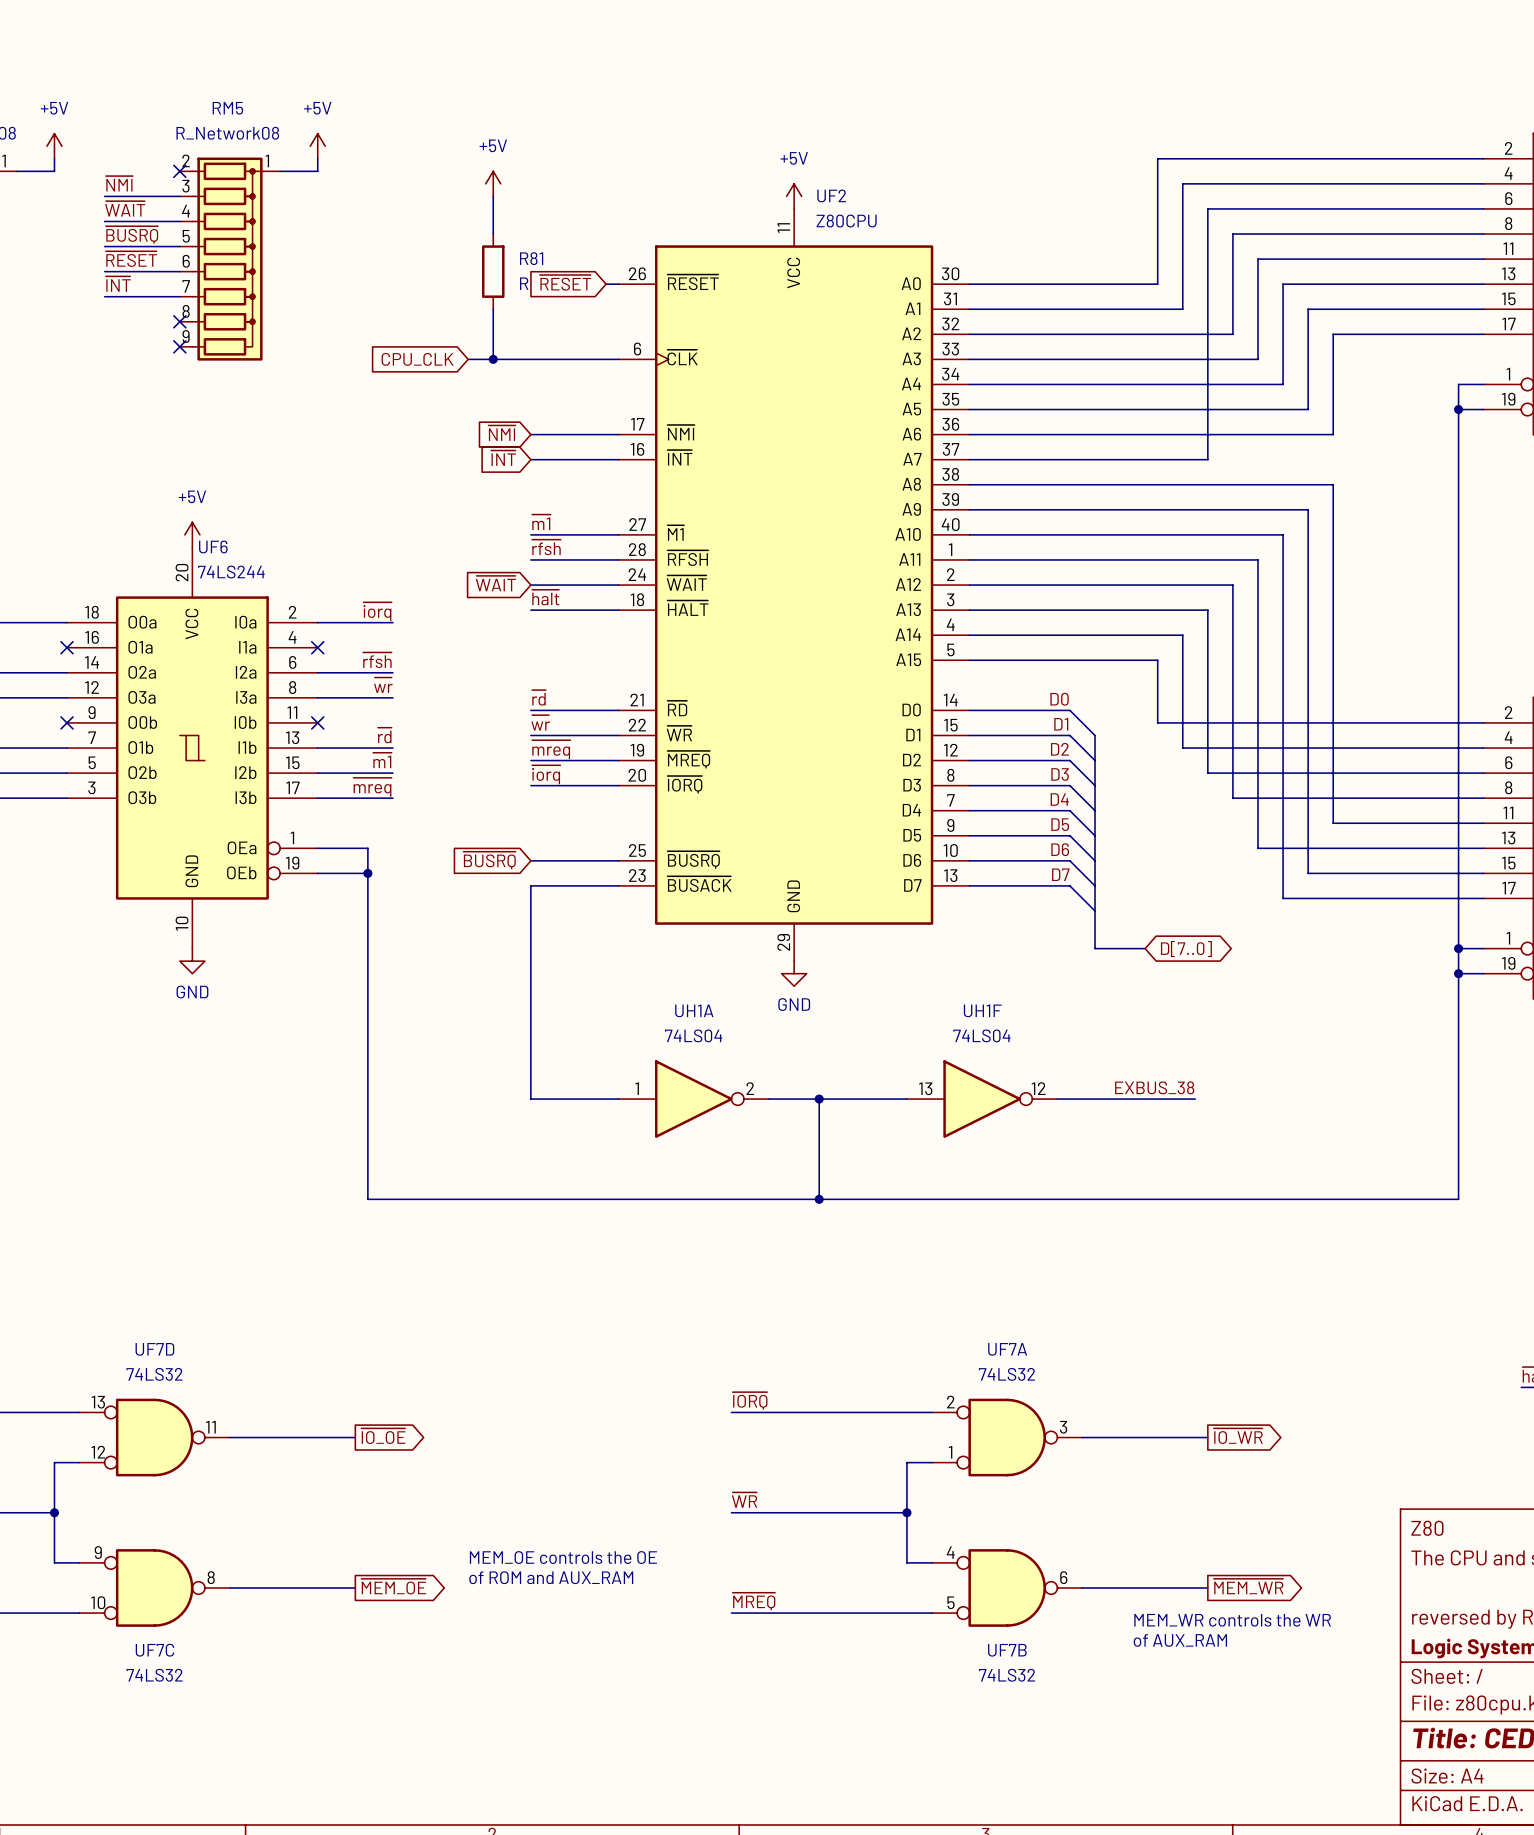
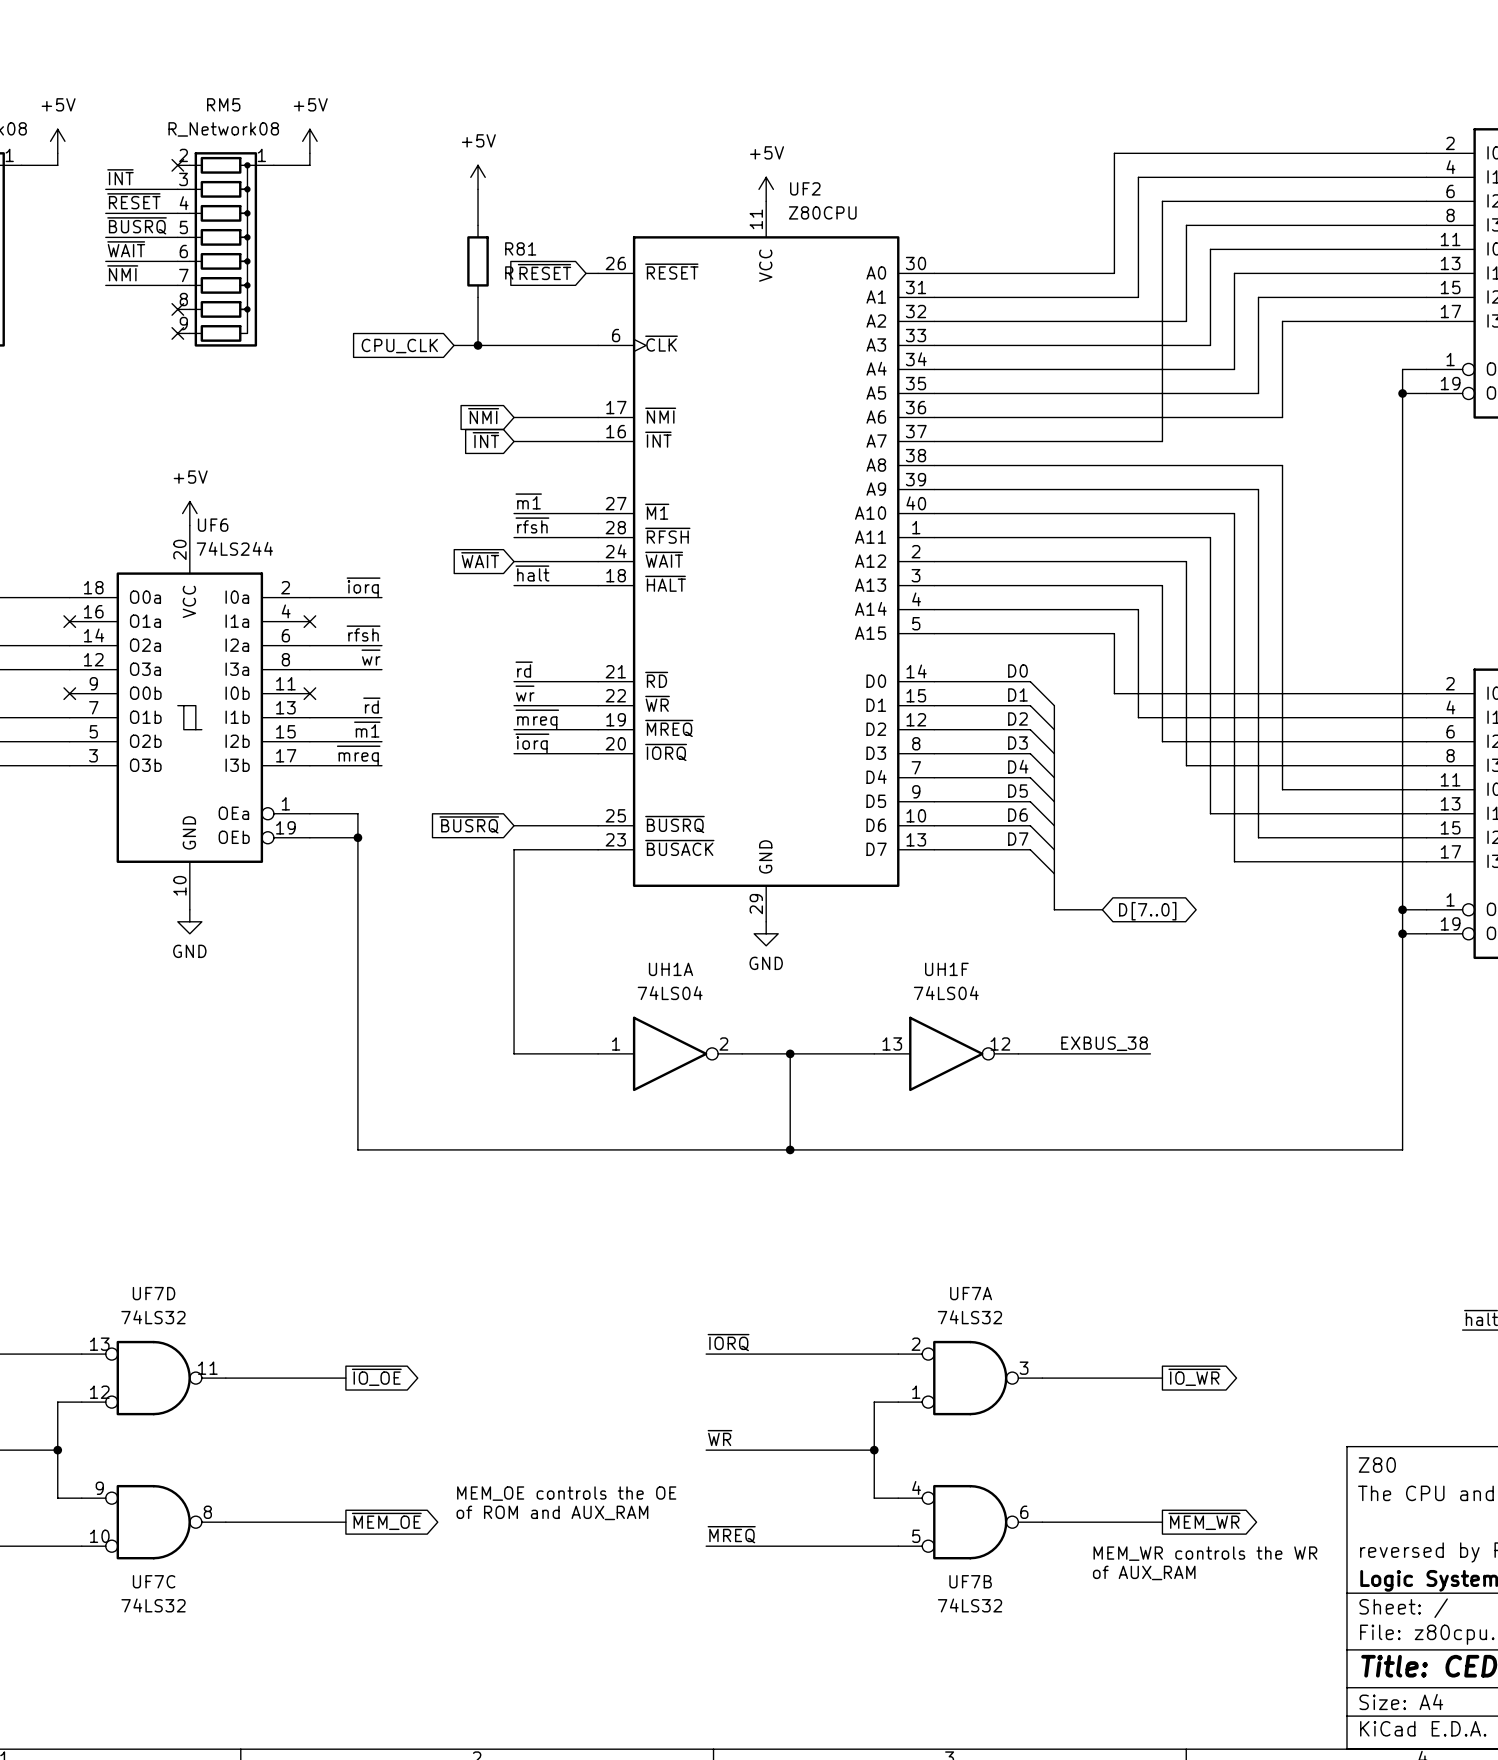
label: ~{NMI} (119, 183) -> ~{INT} (120, 177)
label: ~{WAIT} (125, 208) -> ~{RESET} (133, 201)
label: ~{RESET} (131, 259) -> ~{WAIT} (126, 249)
label: ~{INT} (118, 284) -> ~{NMI} (122, 273)

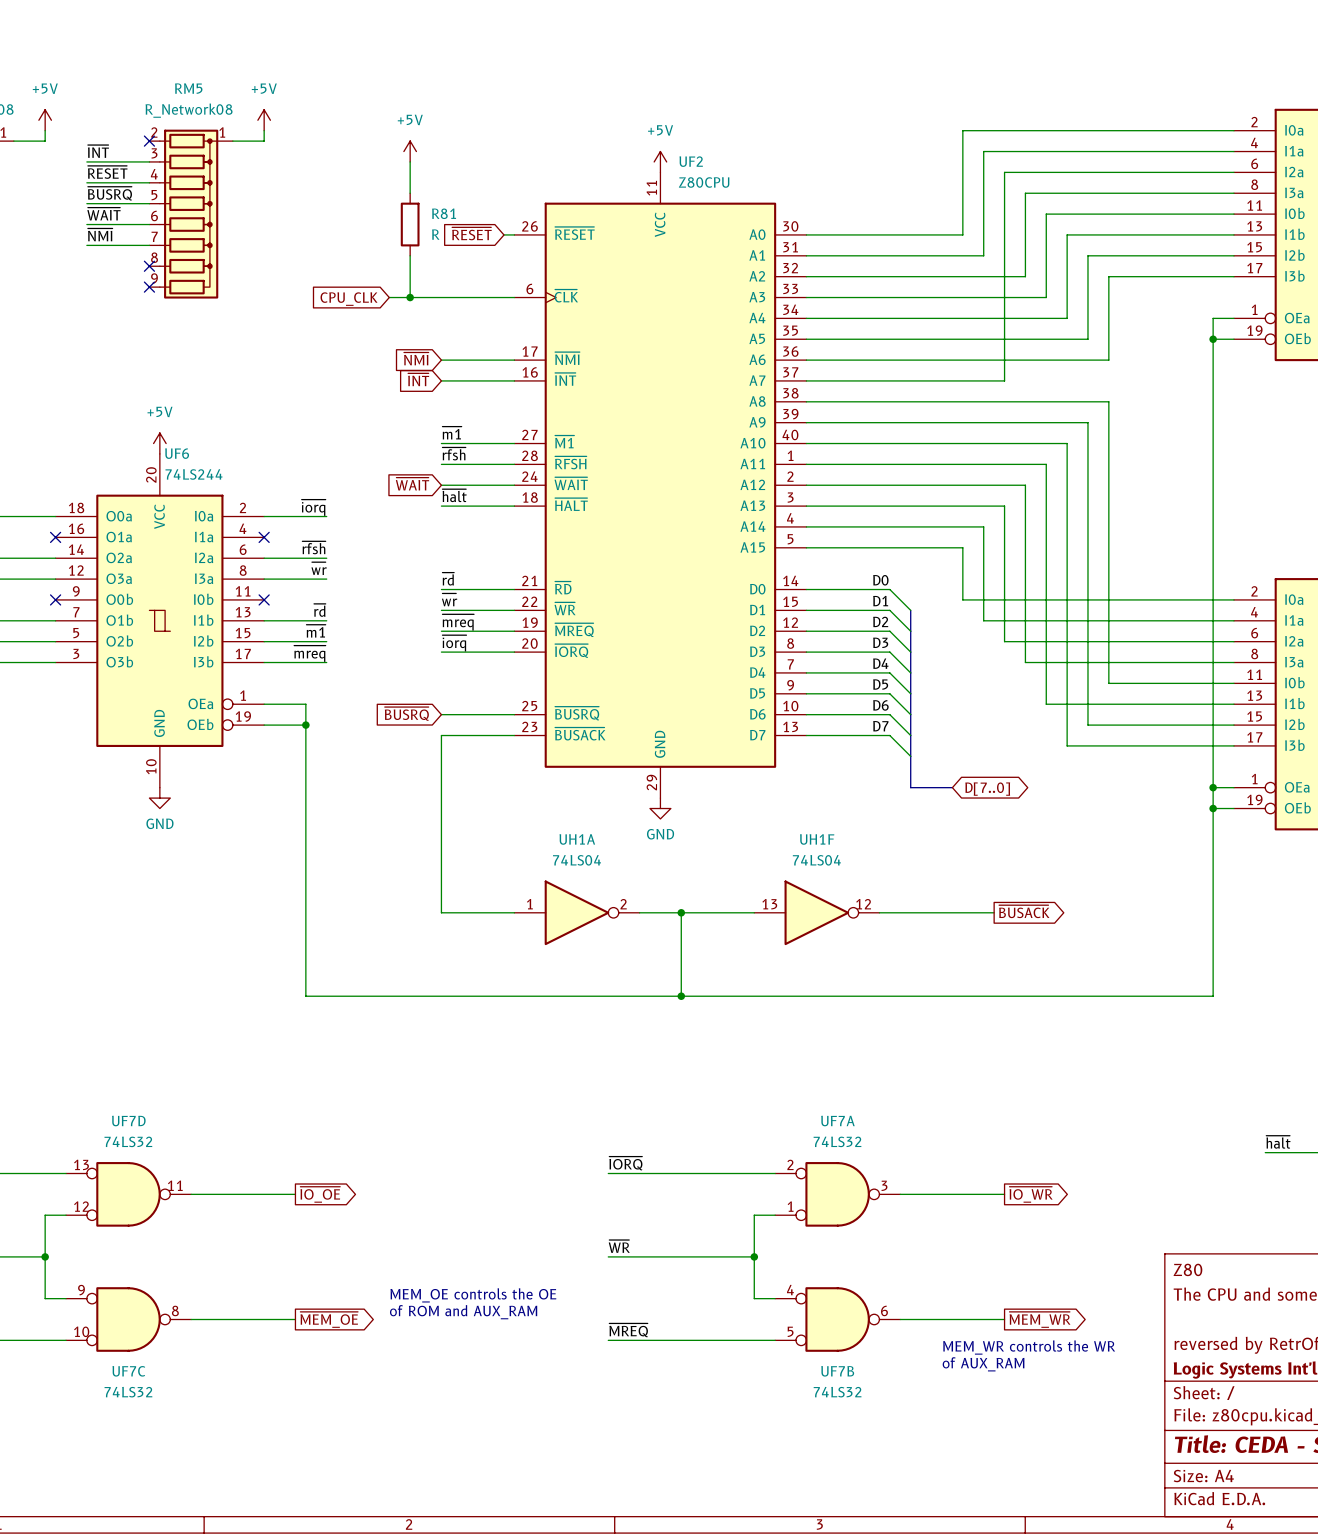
label: EXBUS_38 (1104, 1043) -> none
global label: none -> ~{BUSACK} (1024, 911)

